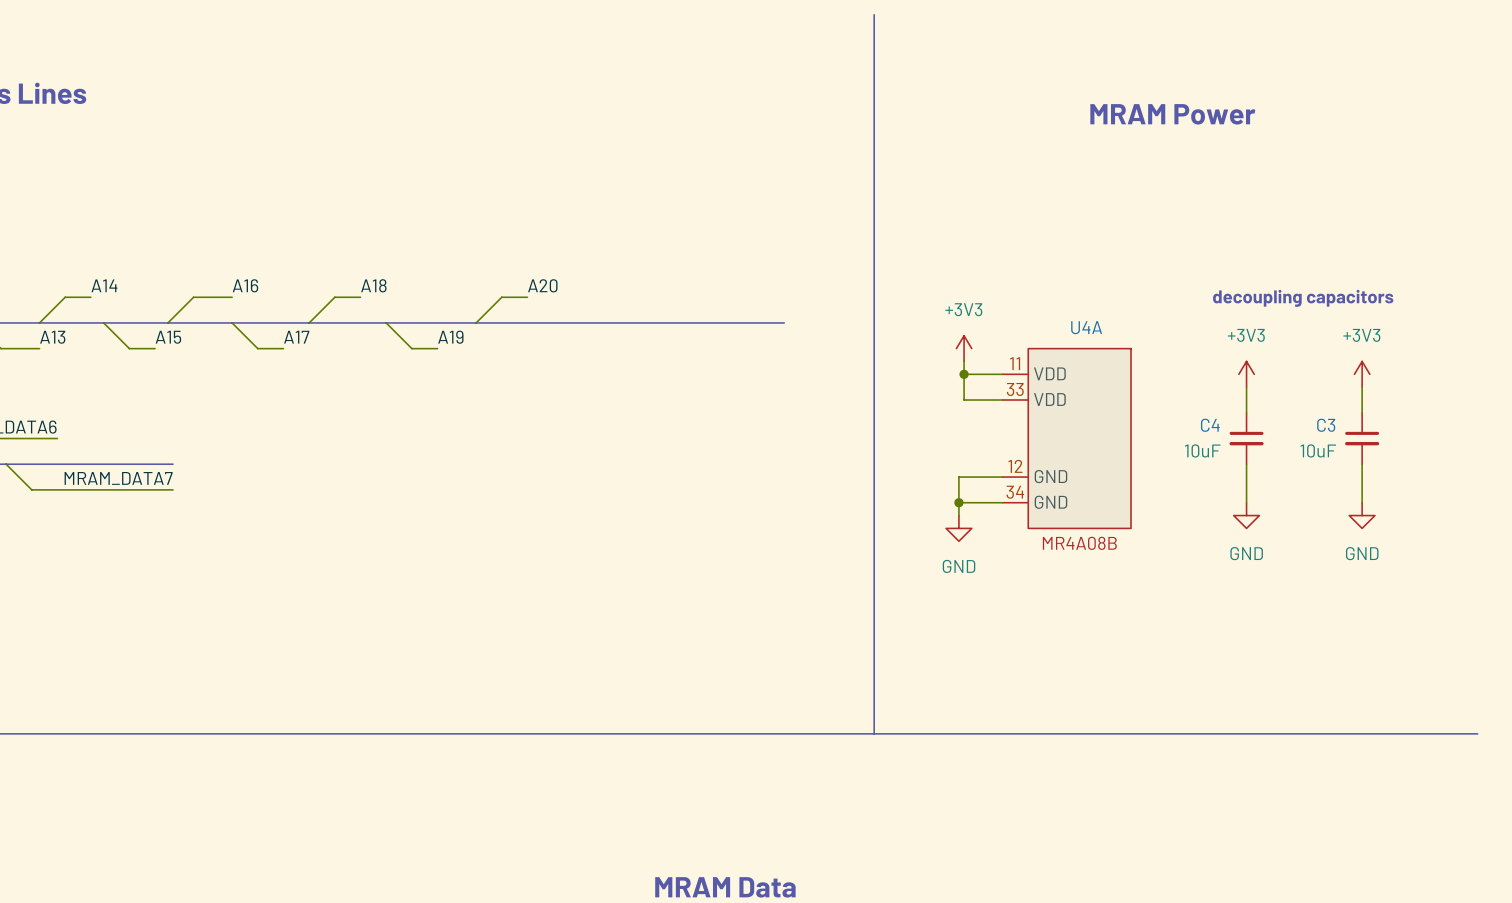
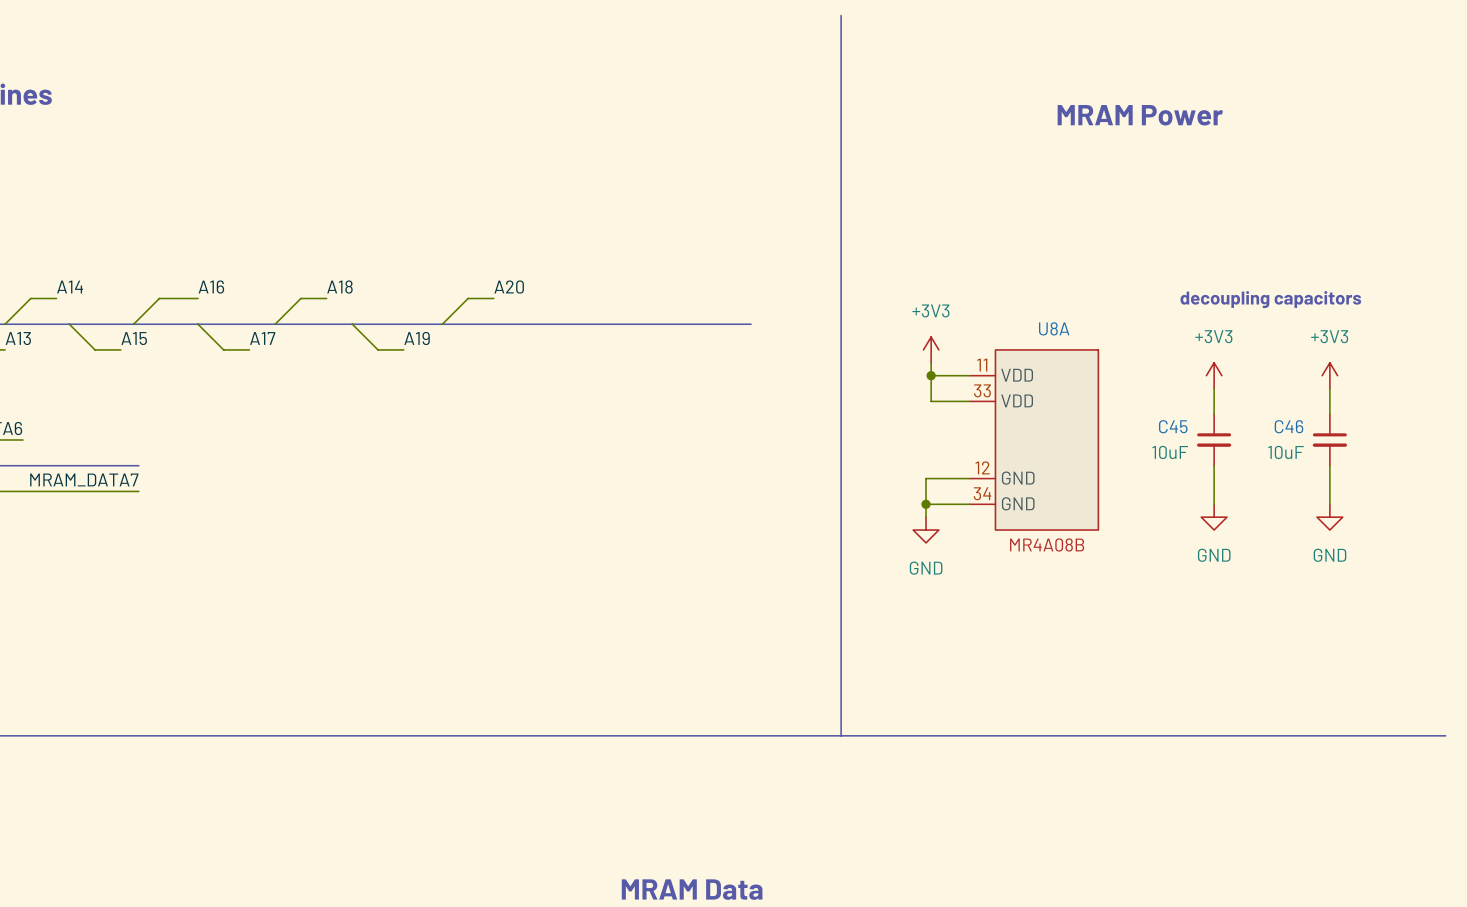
U4A name: U4A (1086, 327) -> U8A (1054, 328)
C4 name: C4 (1210, 425) -> C45 (1173, 426)
C3 name: C3 (1326, 425) -> C46 (1288, 426)

